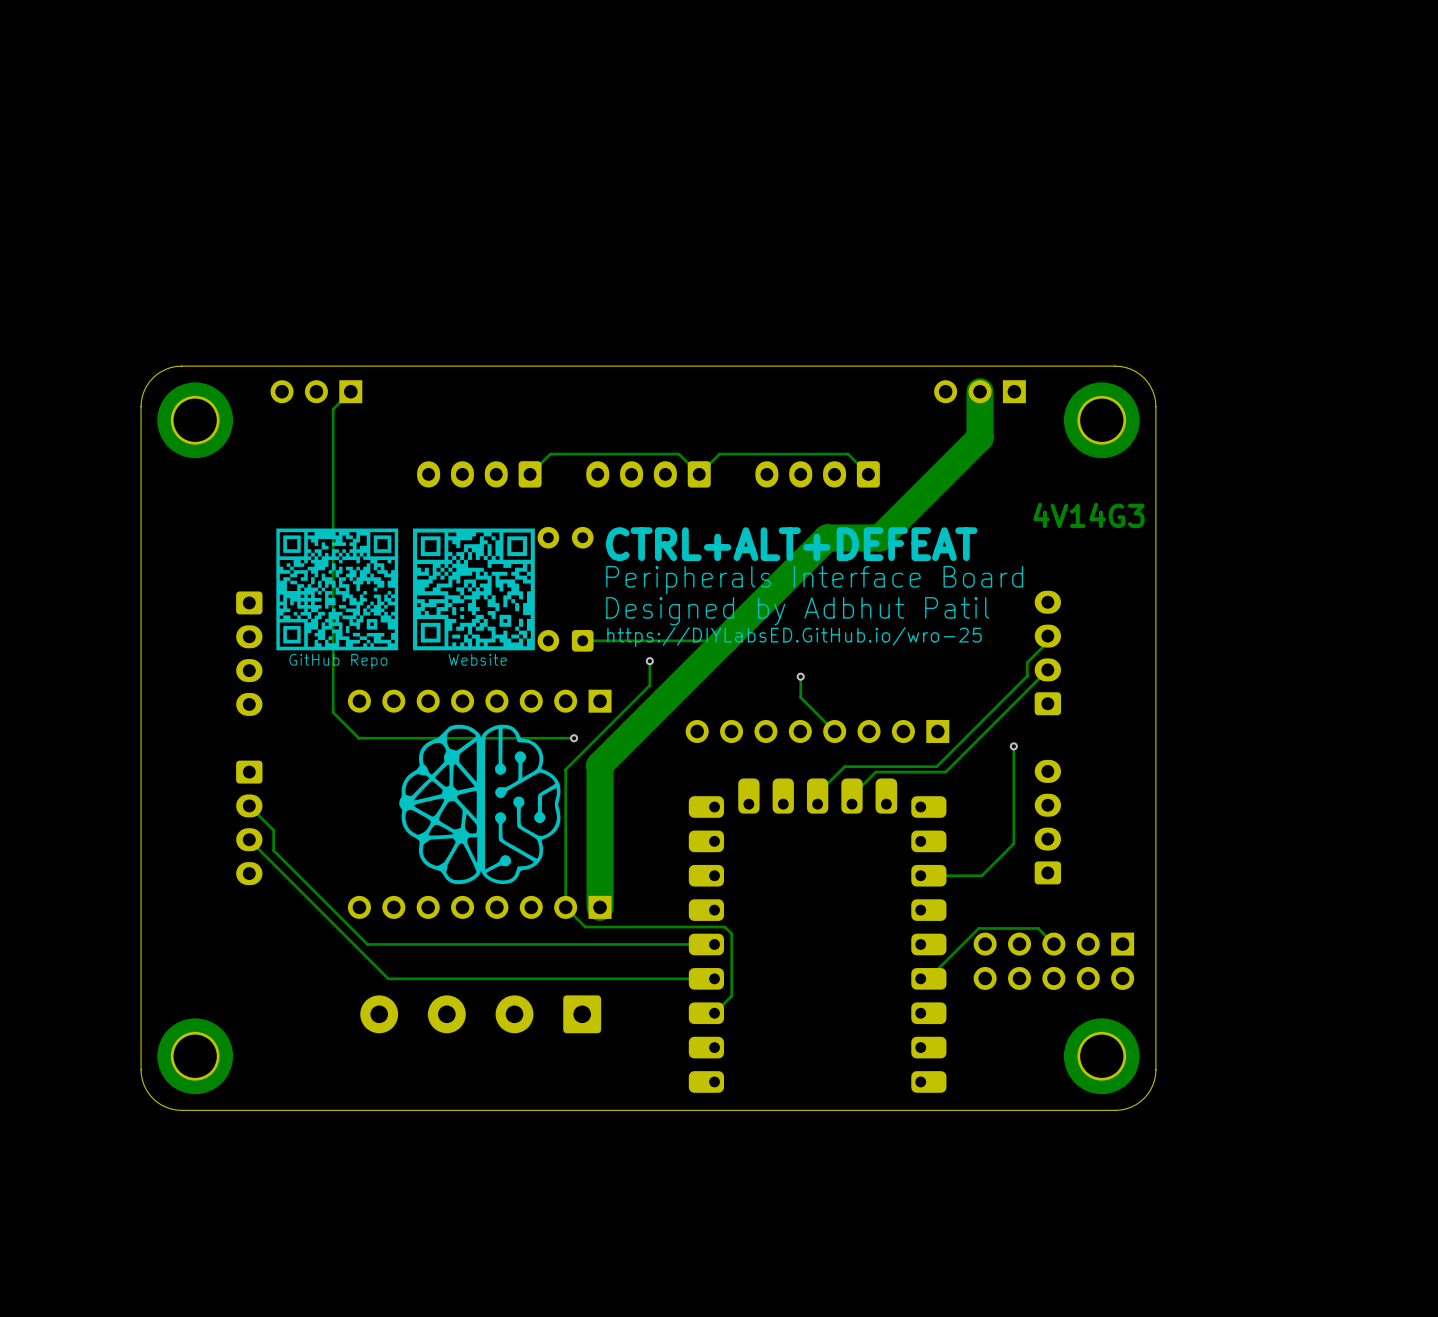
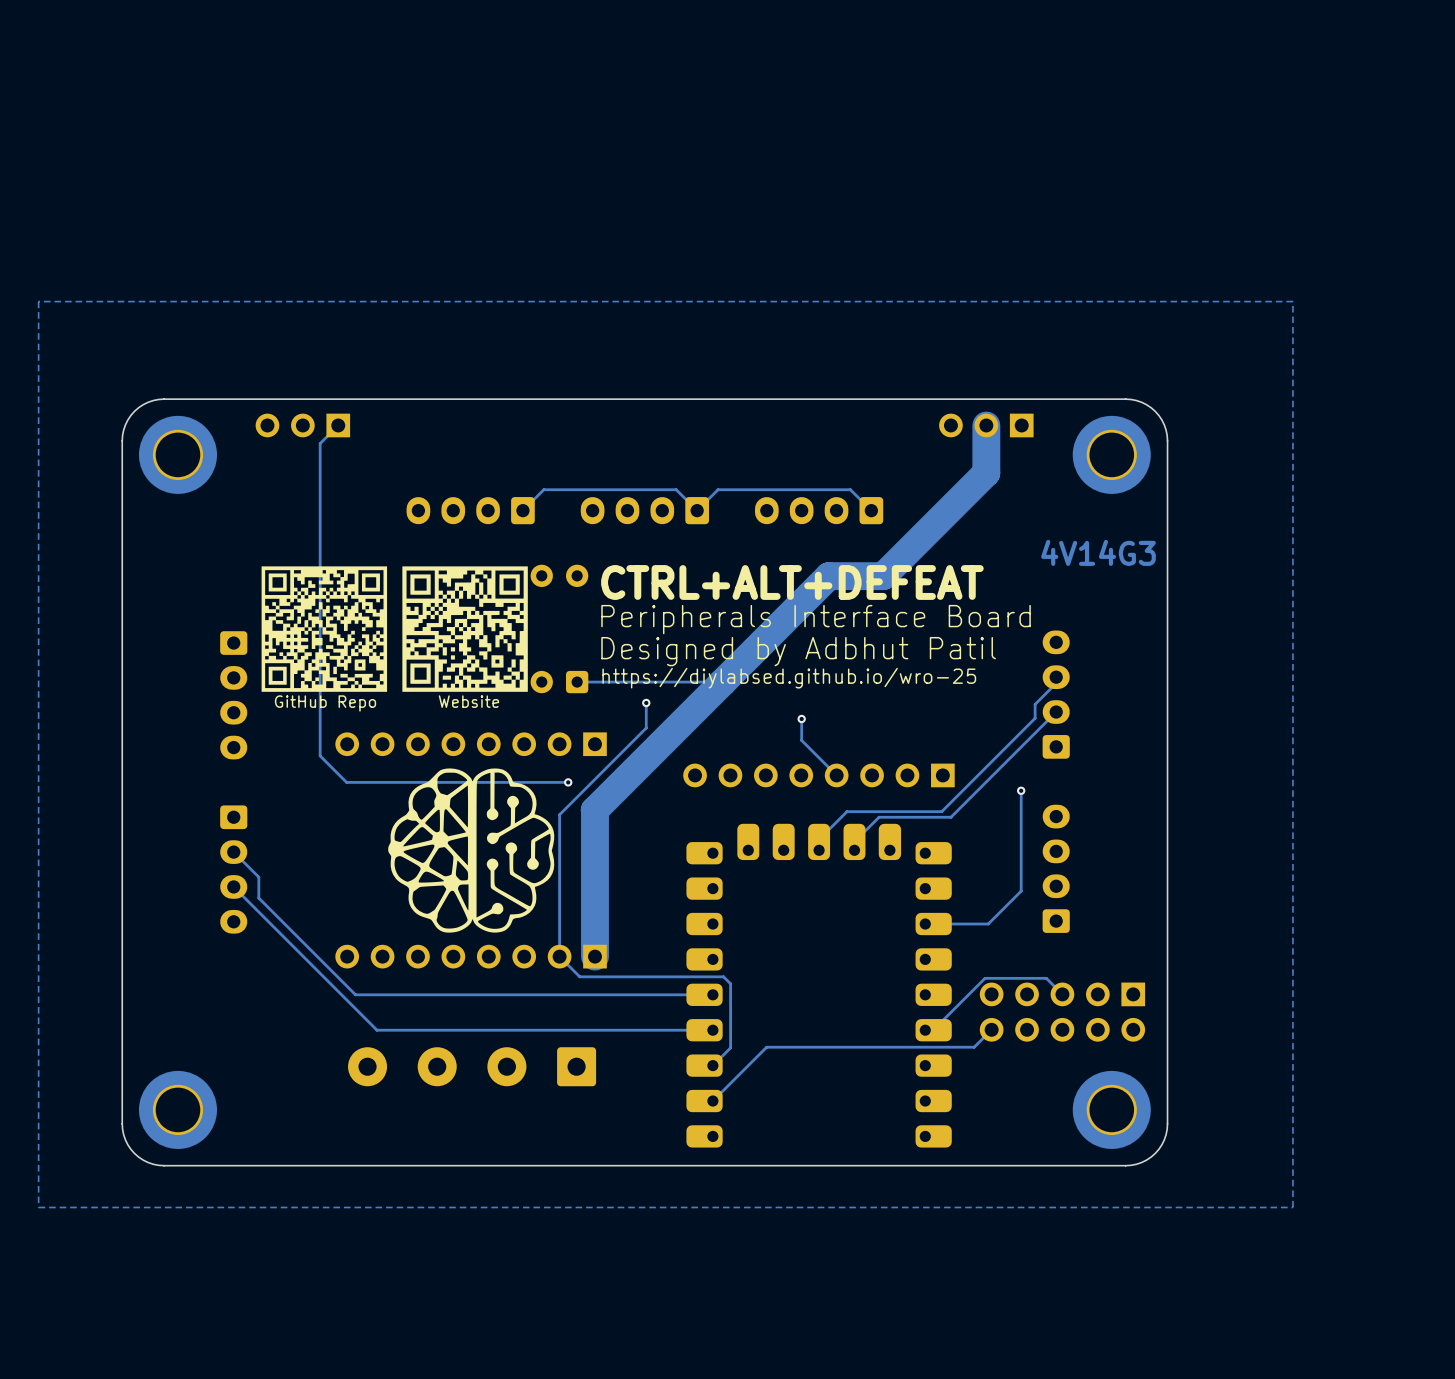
zone outline: none -> (1292, 301) (38, 301) (38, 1207) (1292, 1207) (1292, 301)
text: https://DIYLabsED.GitHub.io/wro-25 (794, 637) -> https://diylabsed.github.io/wro-25 (789, 678)
track: none -> (991, 1029) (974, 1047) (766, 1047) (712, 1101)

